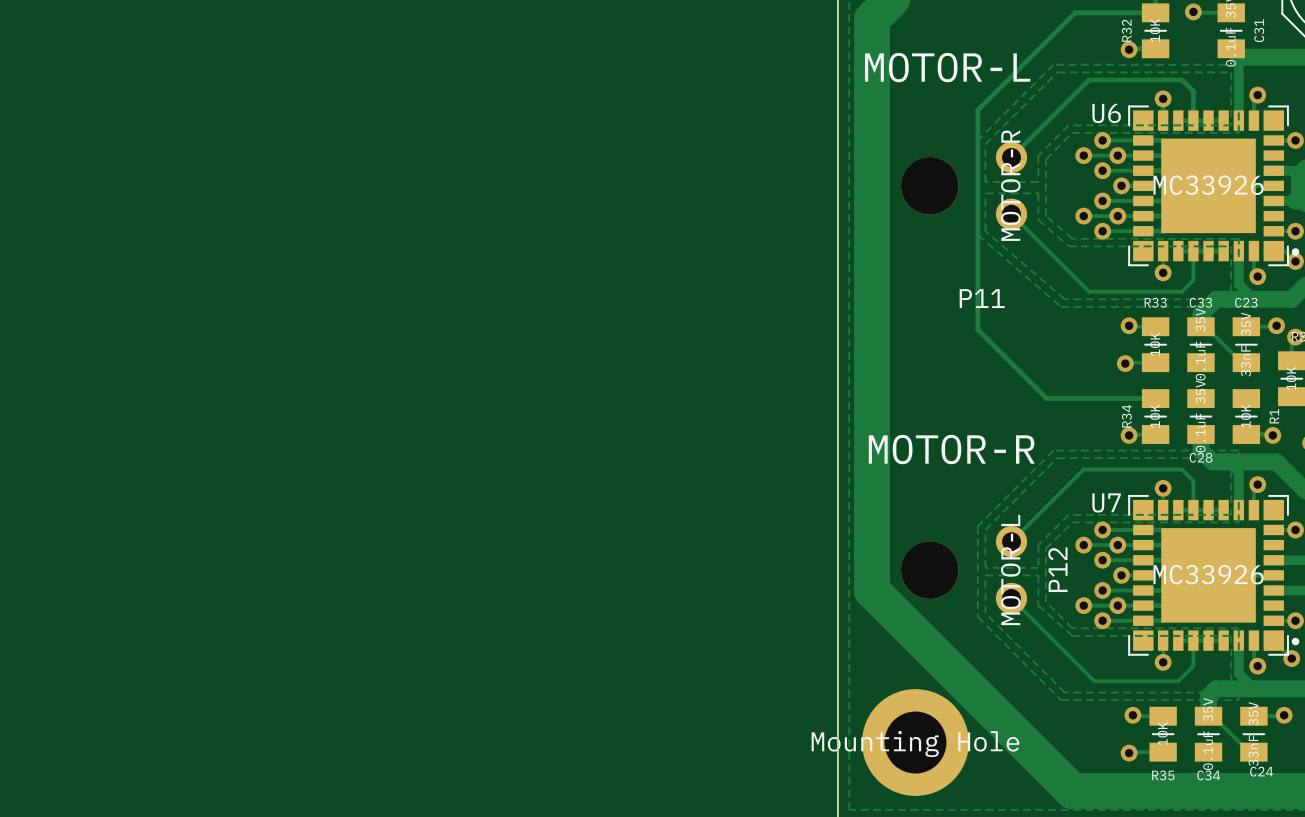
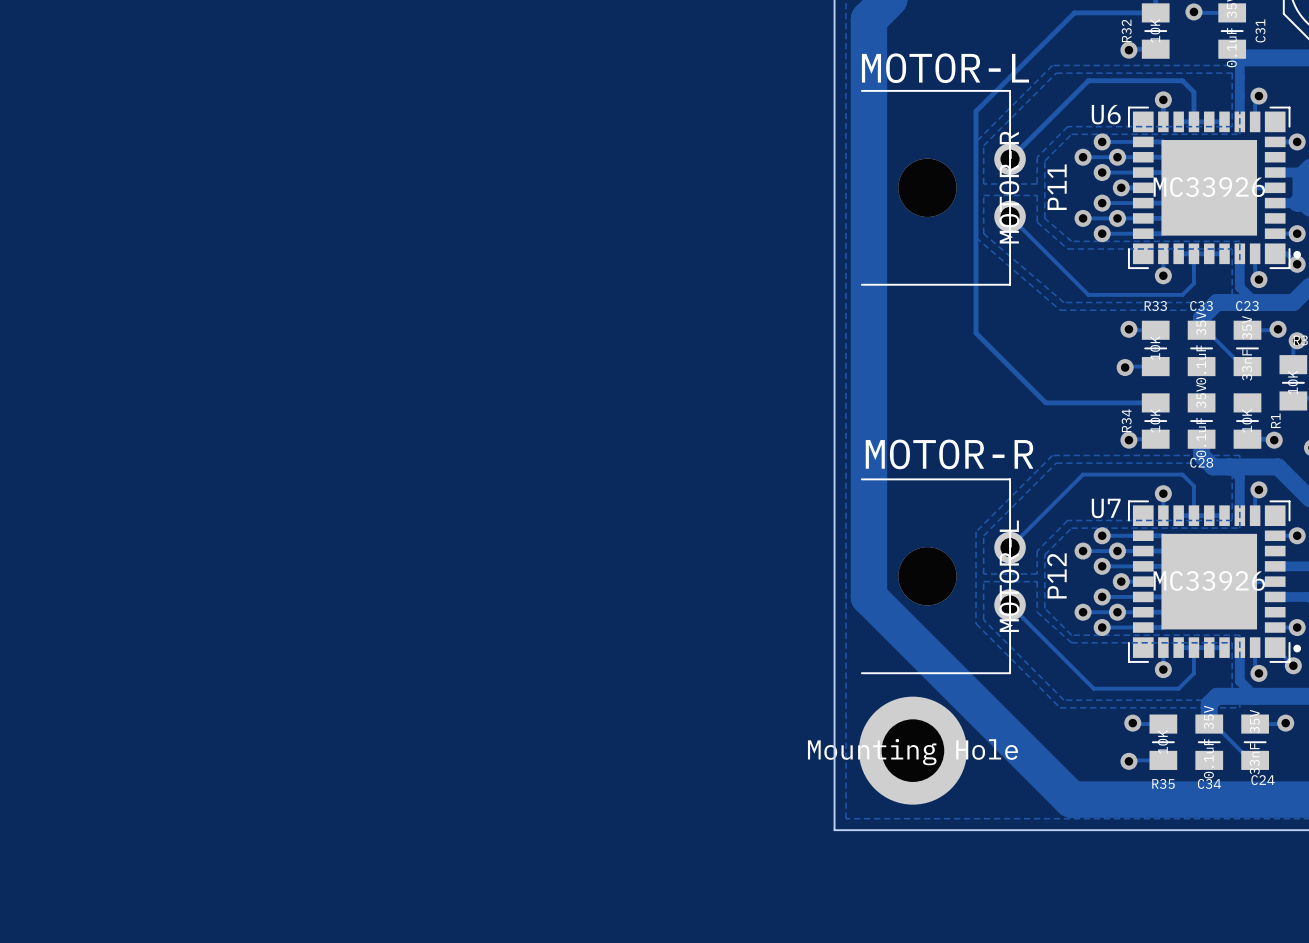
P11 footprint: [900, 141, 1028, 230] -> [860, 89, 1026, 286]
P11 name position: P11 (982, 298) -> P11 (1057, 187)
P12 footprint: [900, 526, 1028, 615] -> [860, 478, 1026, 675]

